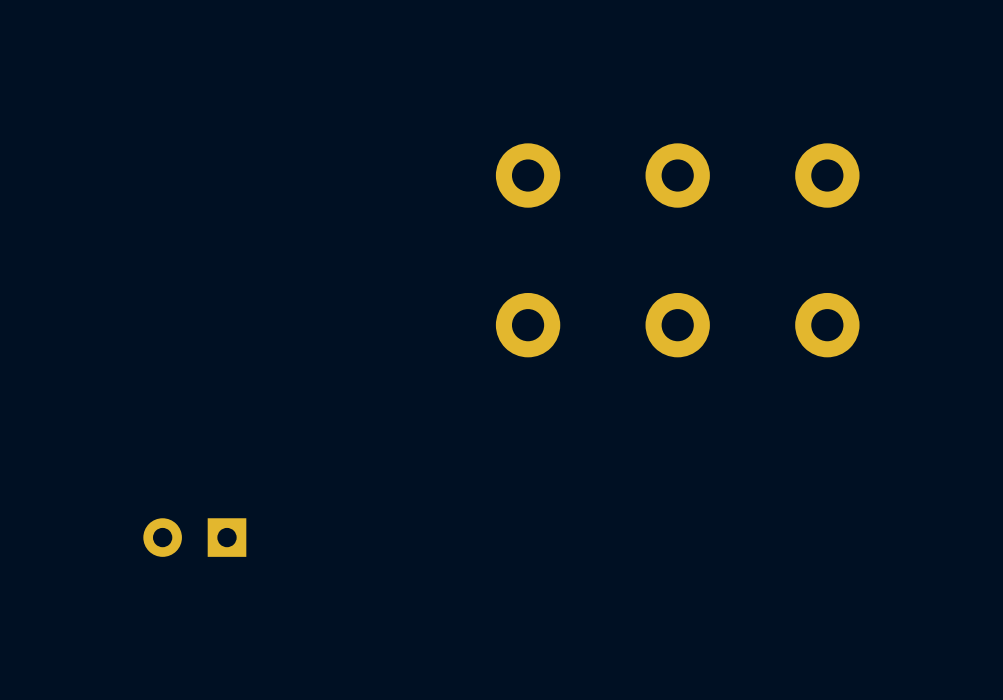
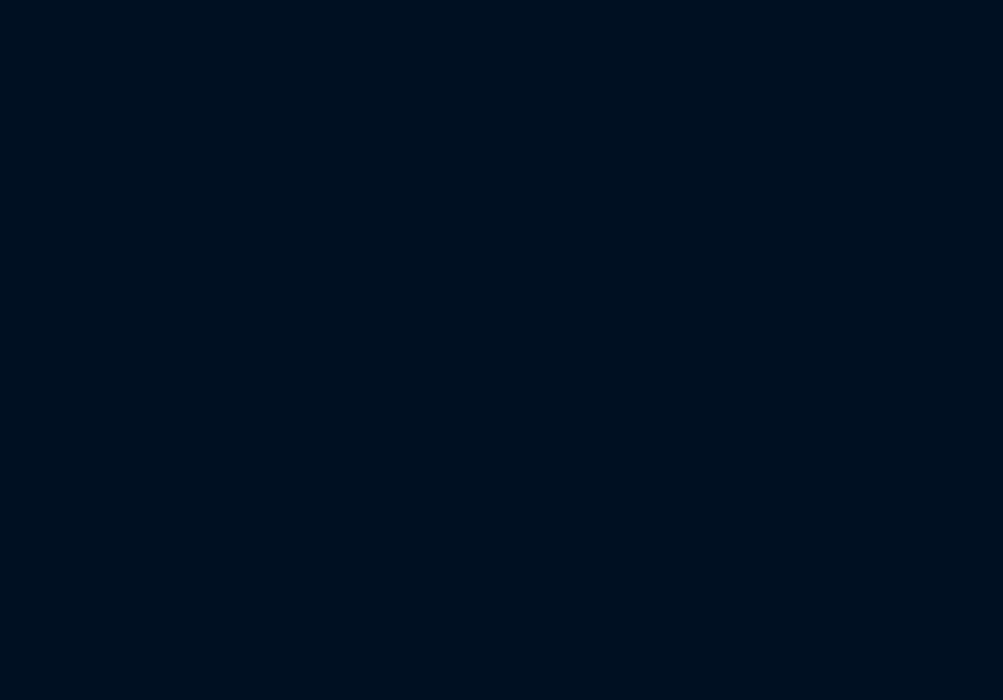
part: (528, 175) -> none
part: (677, 175) -> none
part: (827, 175) -> none
part: (528, 325) -> none
part: (677, 325) -> none
part: (827, 325) -> none
part: (194, 537) -> none

